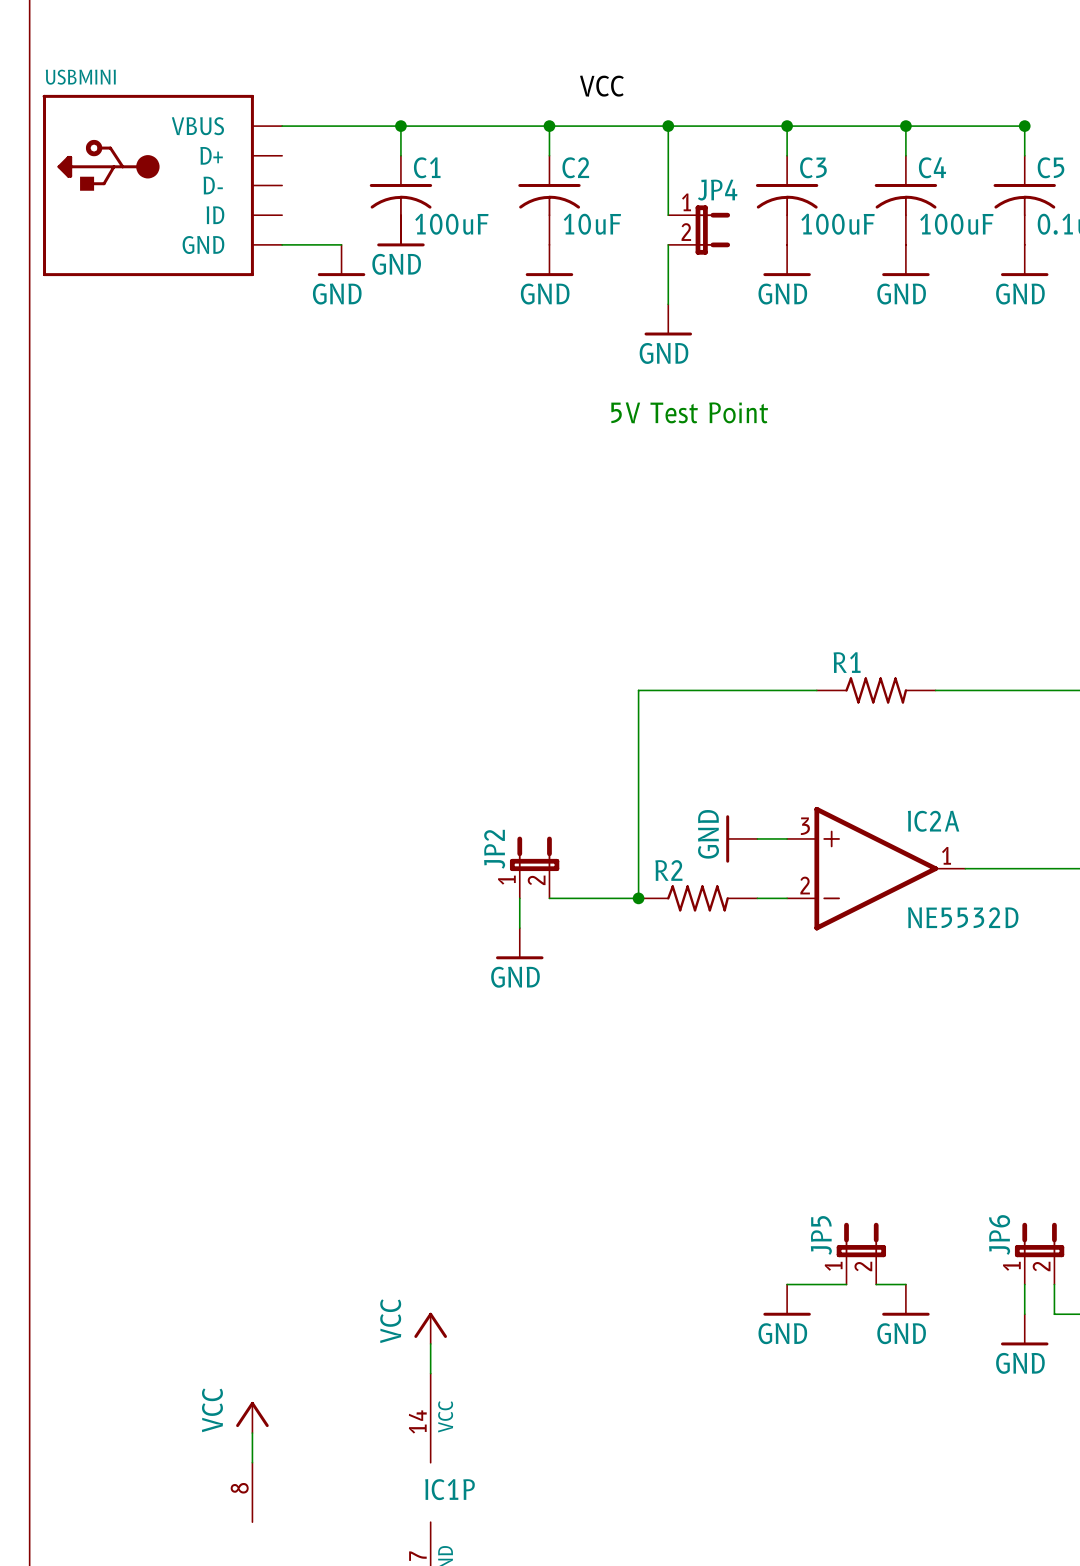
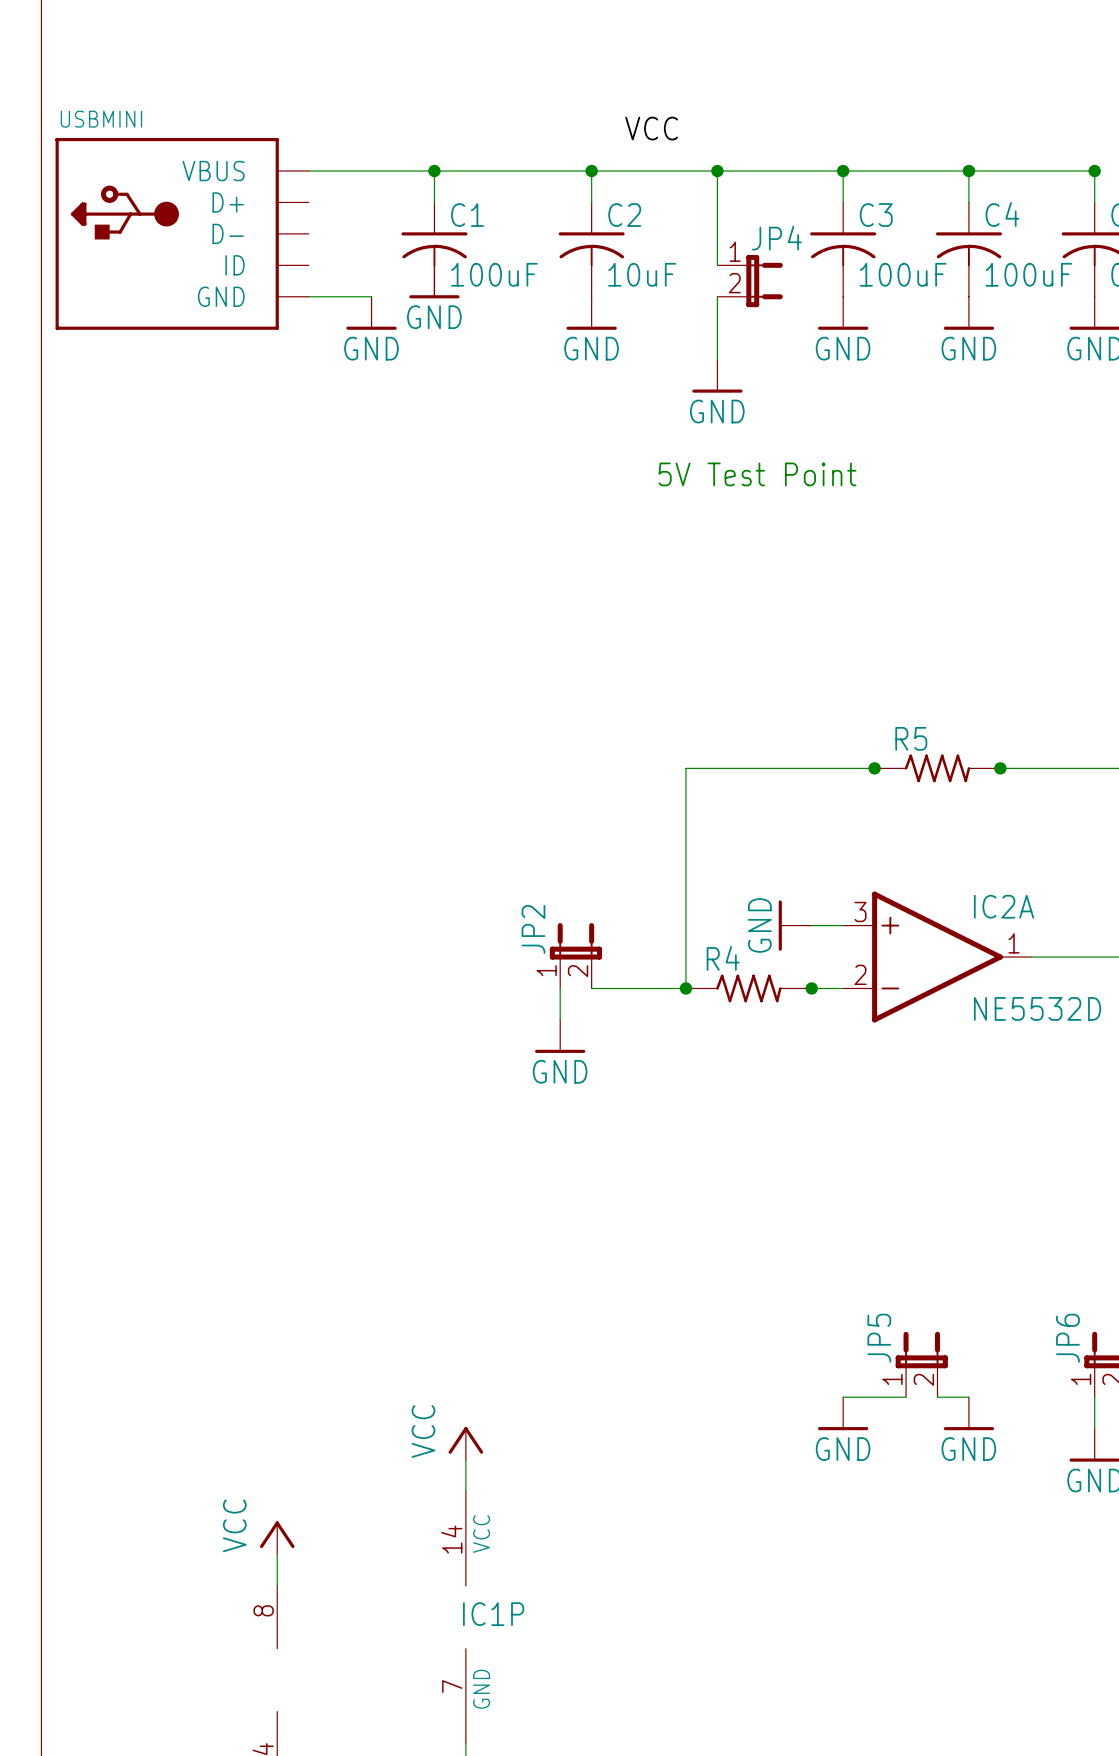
R1 name: R1 (847, 662) -> R5 (911, 738)
junction: none -> (874, 768)
junction: none -> (1000, 768)
R2 name: R2 (668, 870) -> R4 (723, 958)
junction: none -> (811, 988)

